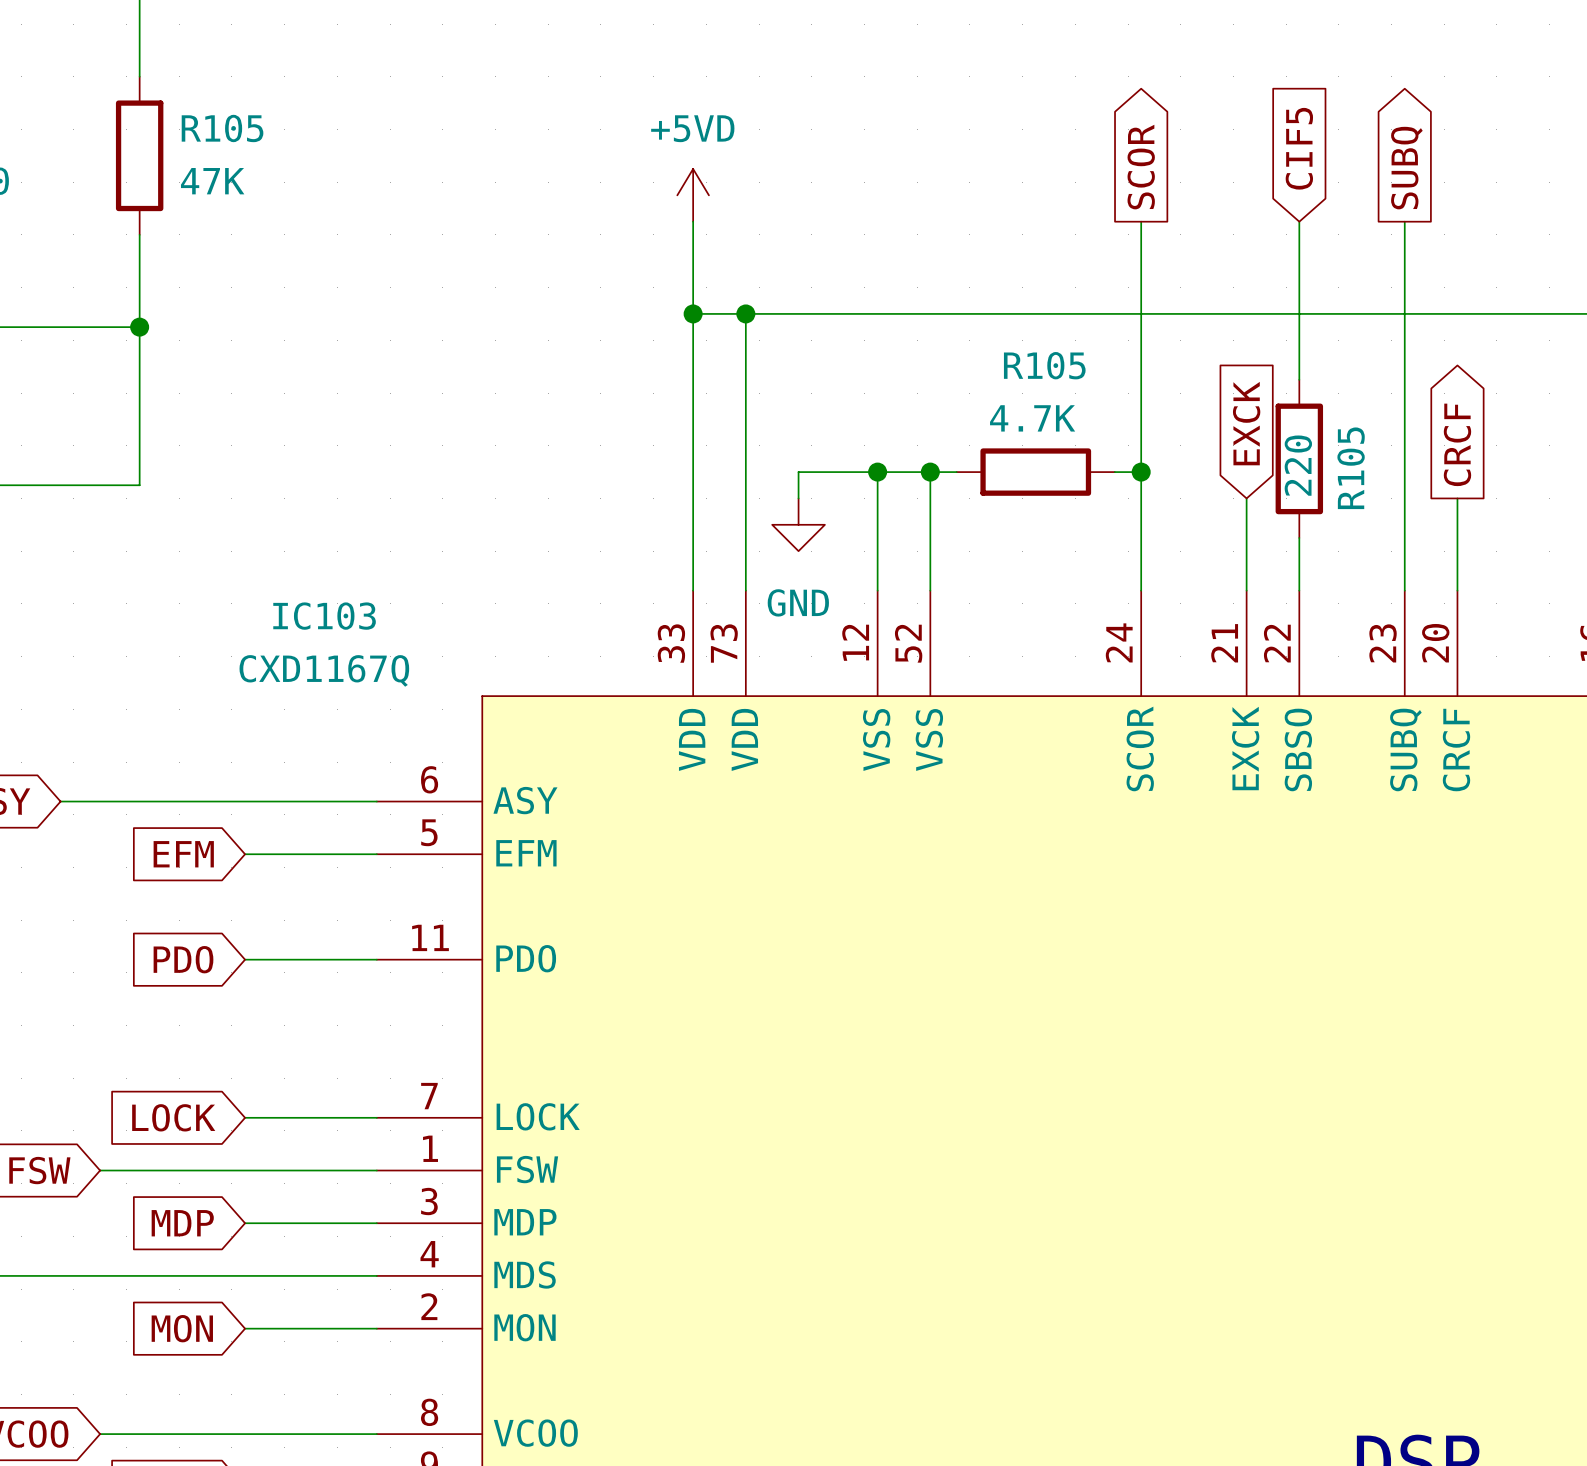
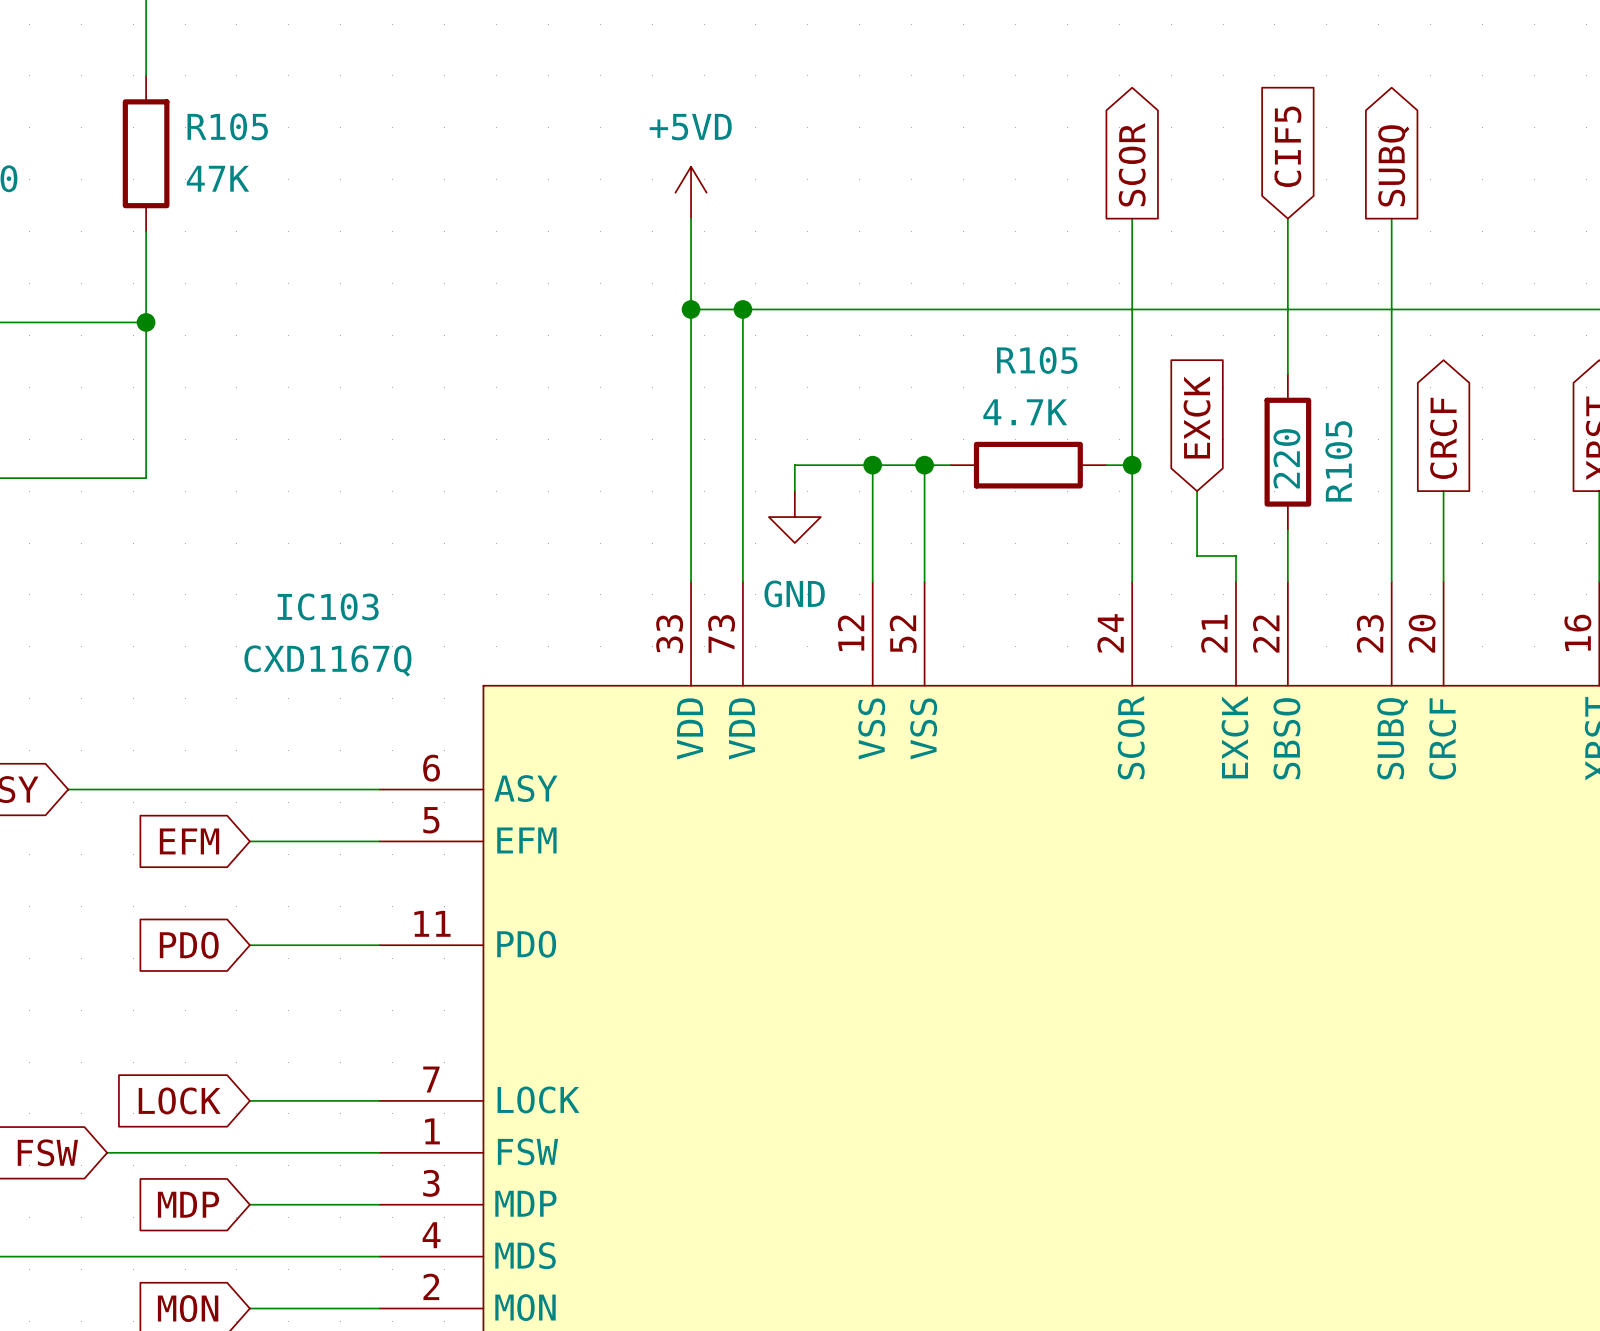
global label position: EXCK (1246, 423) -> EXCK (1197, 417)
wire: (1246, 498) (1246, 564) -> (1197, 491) (1197, 555) (1235, 555)

